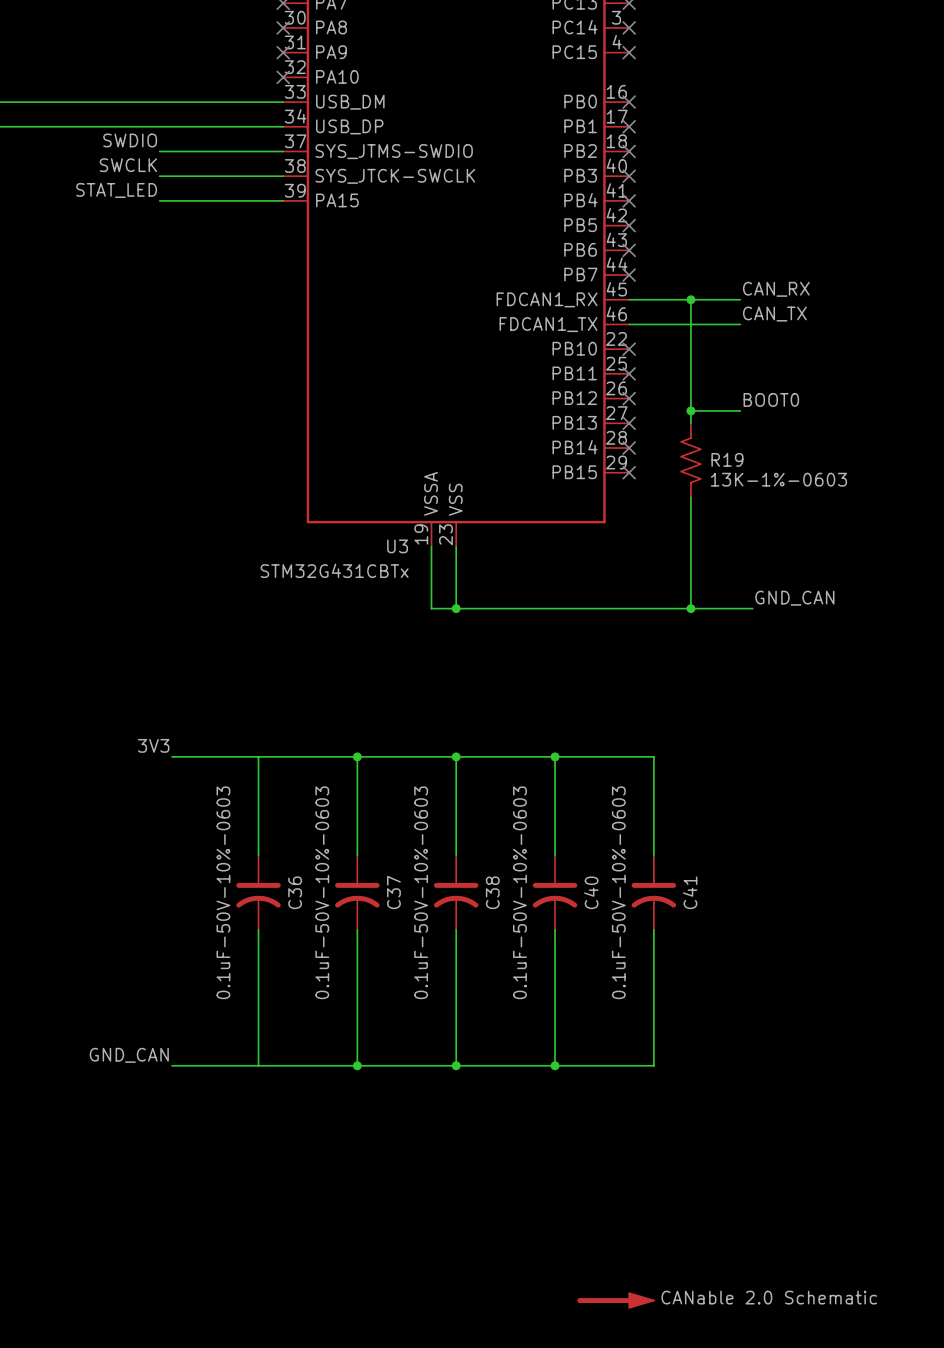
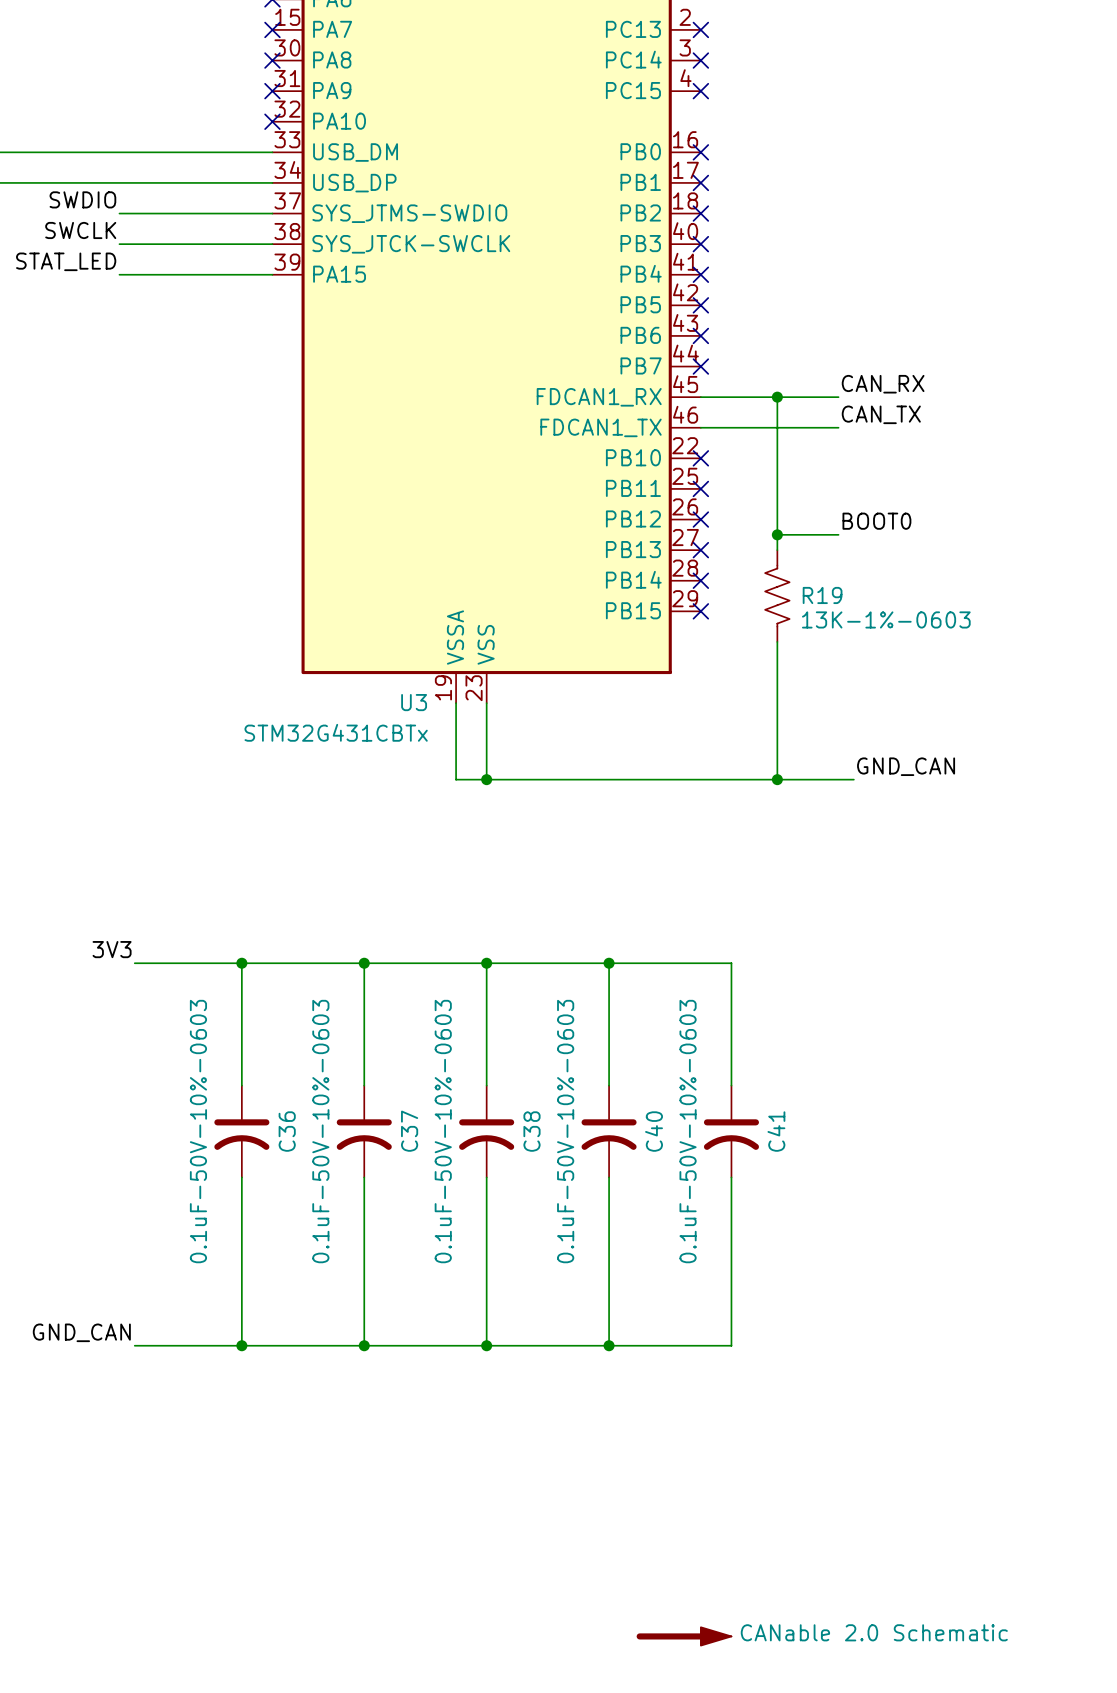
junction: none -> (241, 963)
junction: none -> (241, 1345)

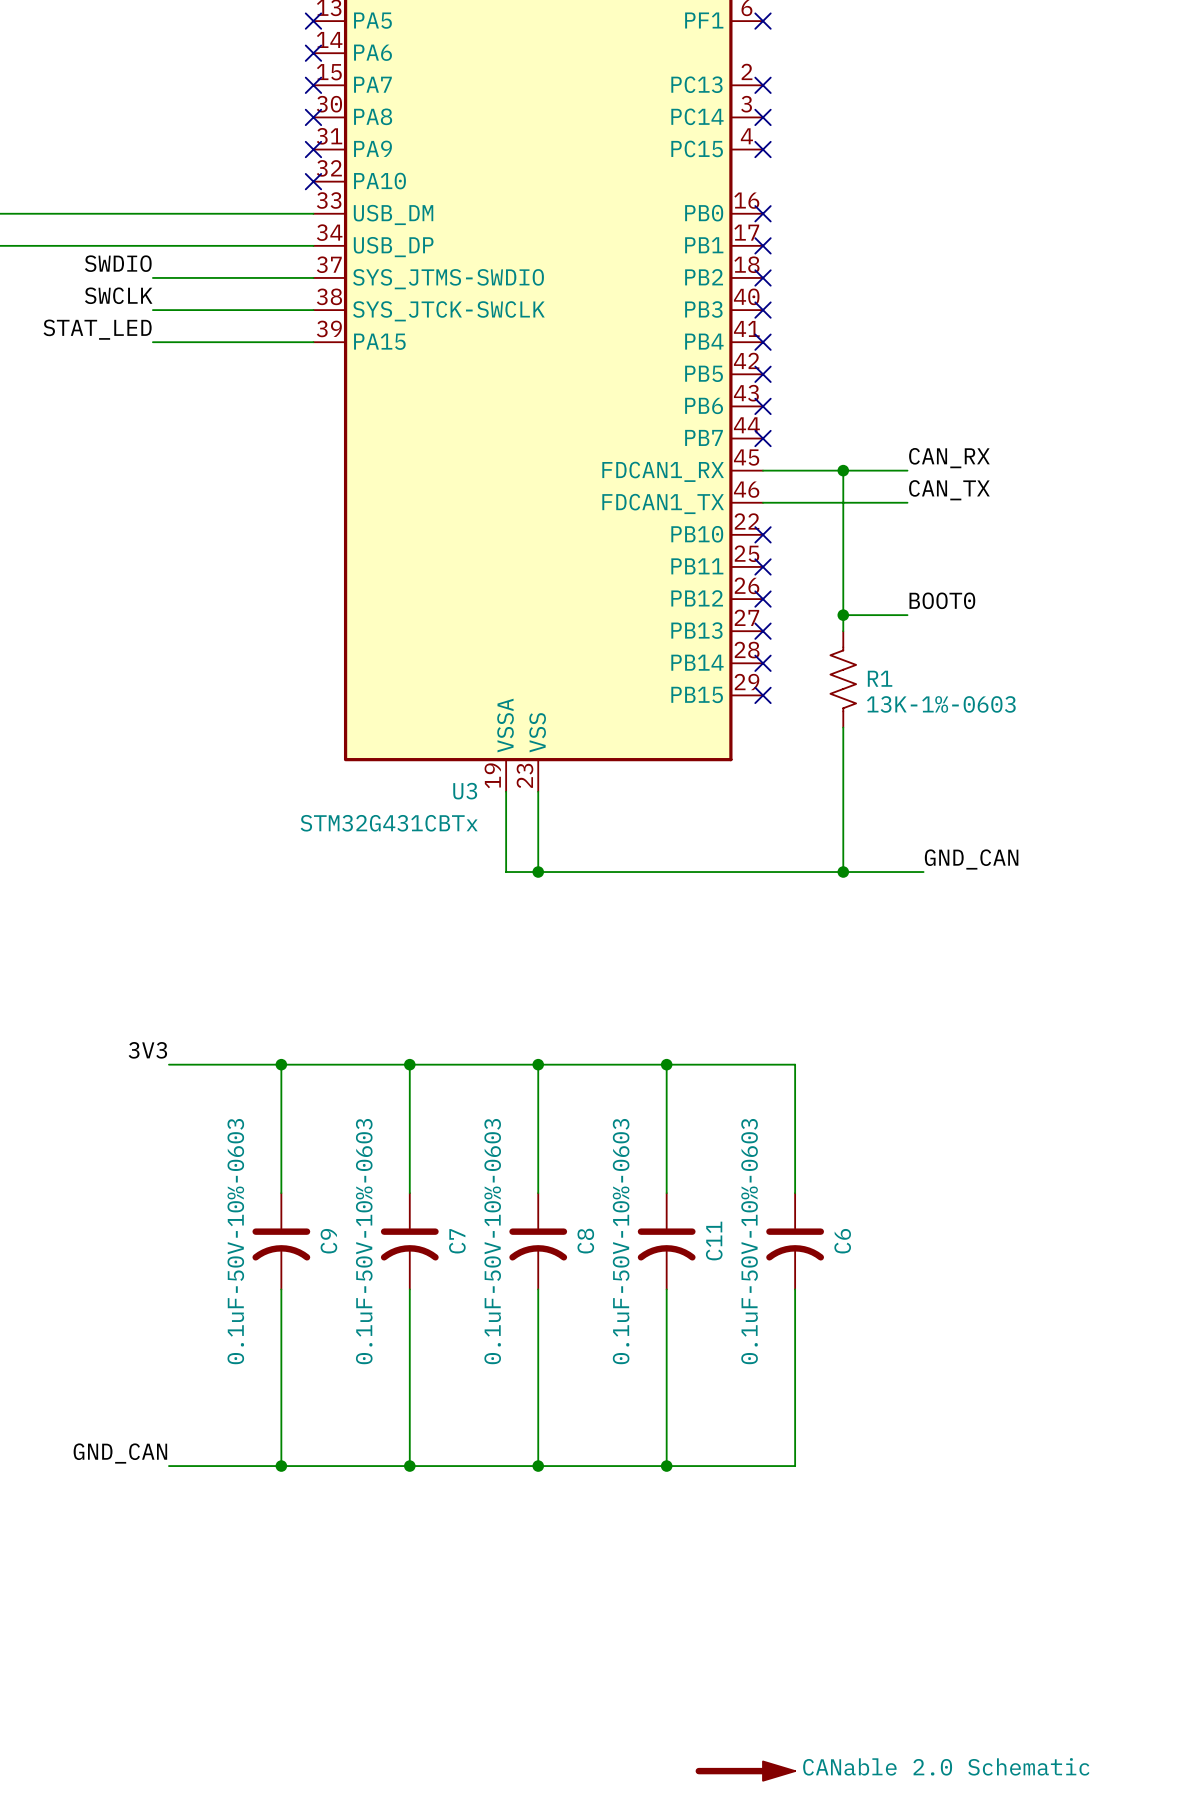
R19 name: R19 (822, 595) -> R1 (880, 678)
C36 name: C36 (287, 1131) -> C9 (328, 1241)
C37 name: C37 (409, 1131) -> C7 (457, 1241)
C38 name: C38 (531, 1131) -> C8 (585, 1241)
C40 name: C40 (654, 1131) -> C11 (714, 1241)
C41 name: C41 (776, 1131) -> C6 (842, 1241)

